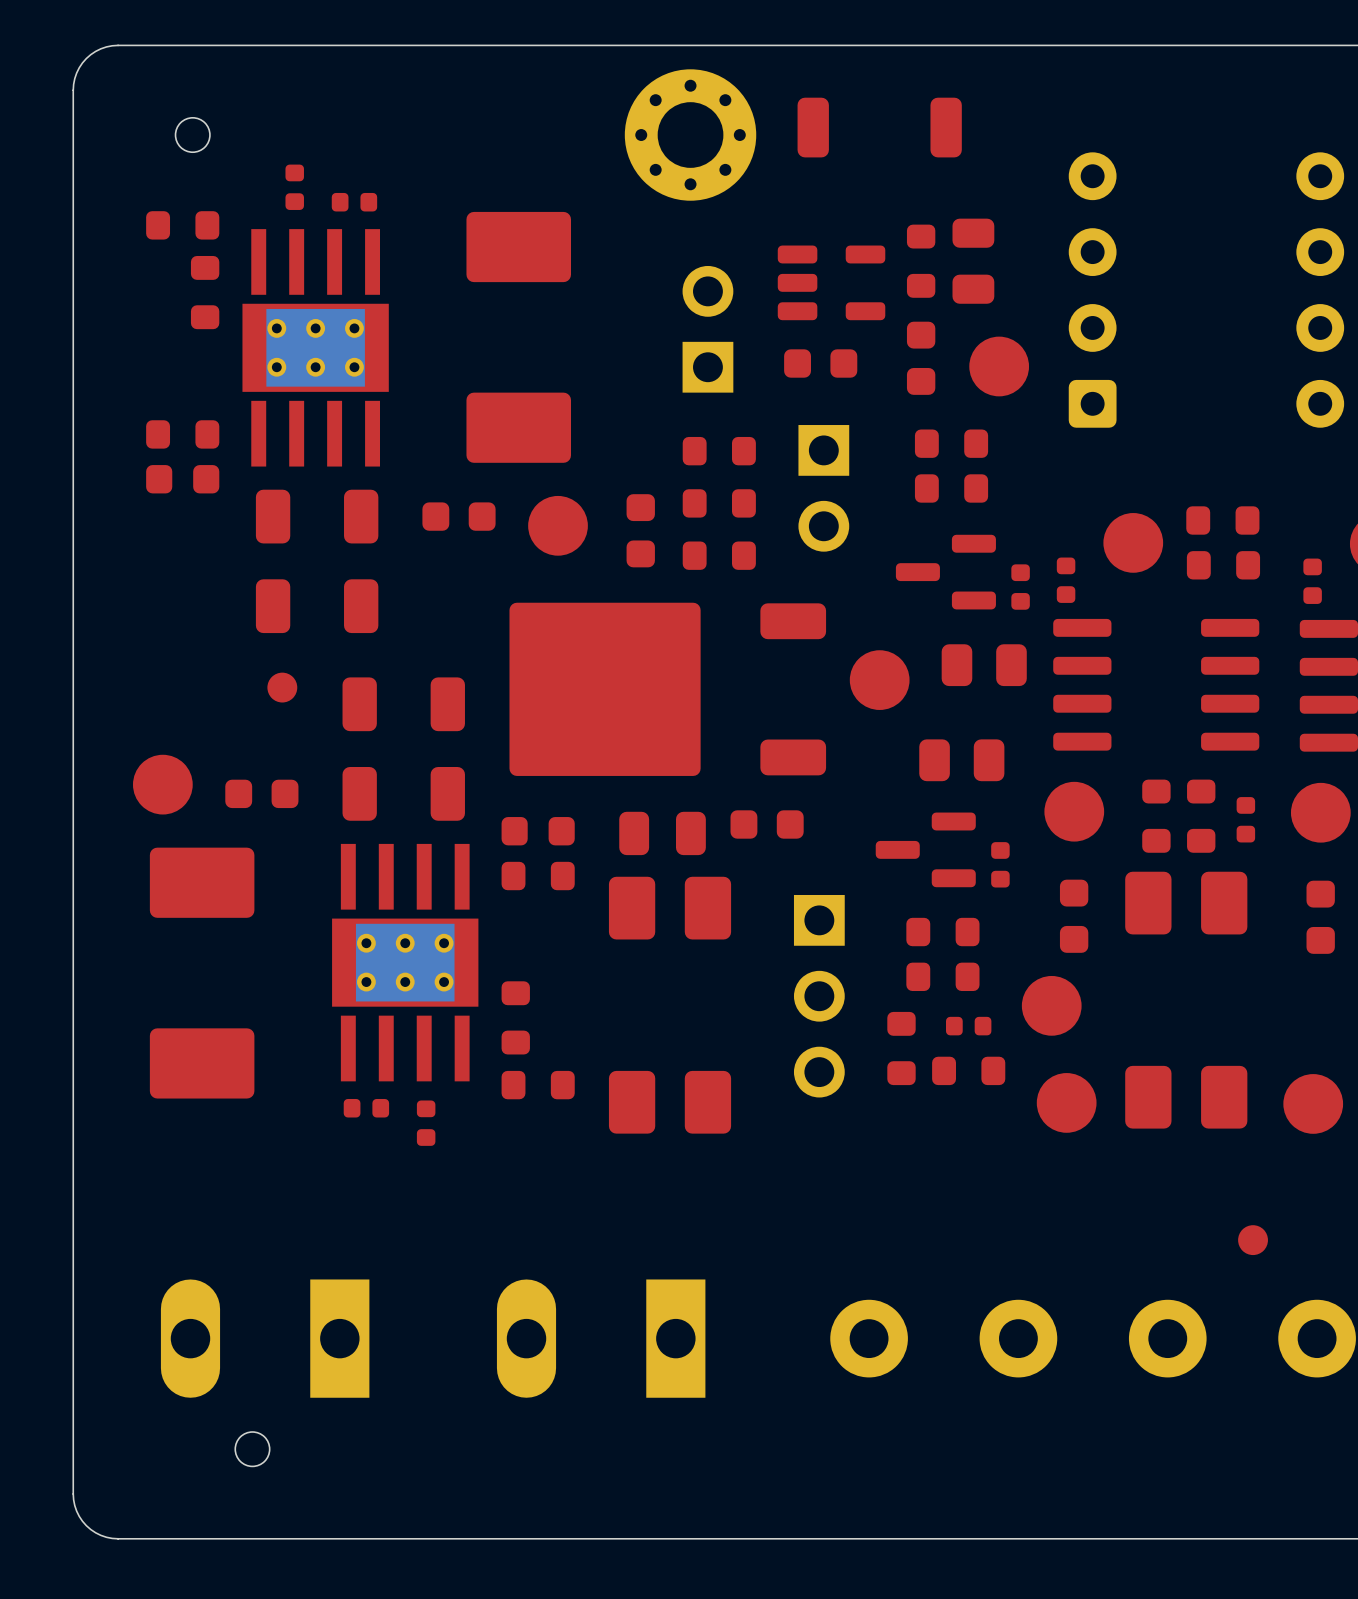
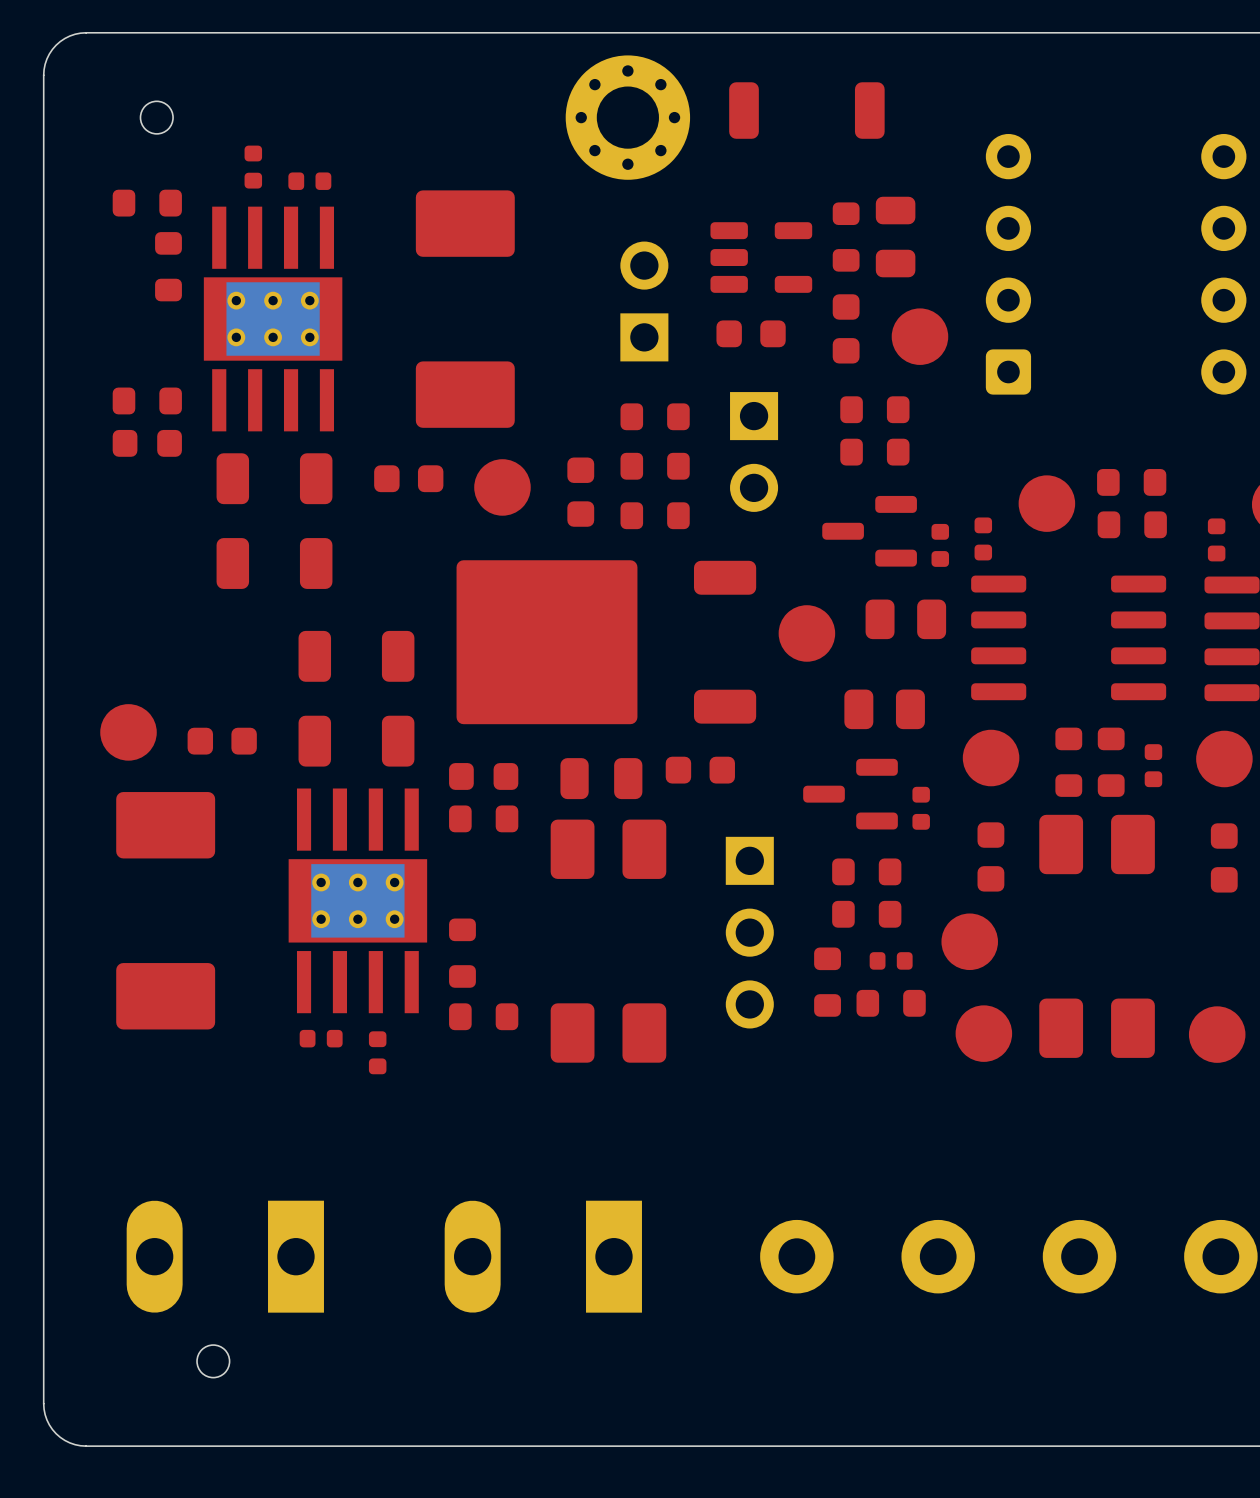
part: (282, 687) -> none
part: (1253, 1240) -> none

